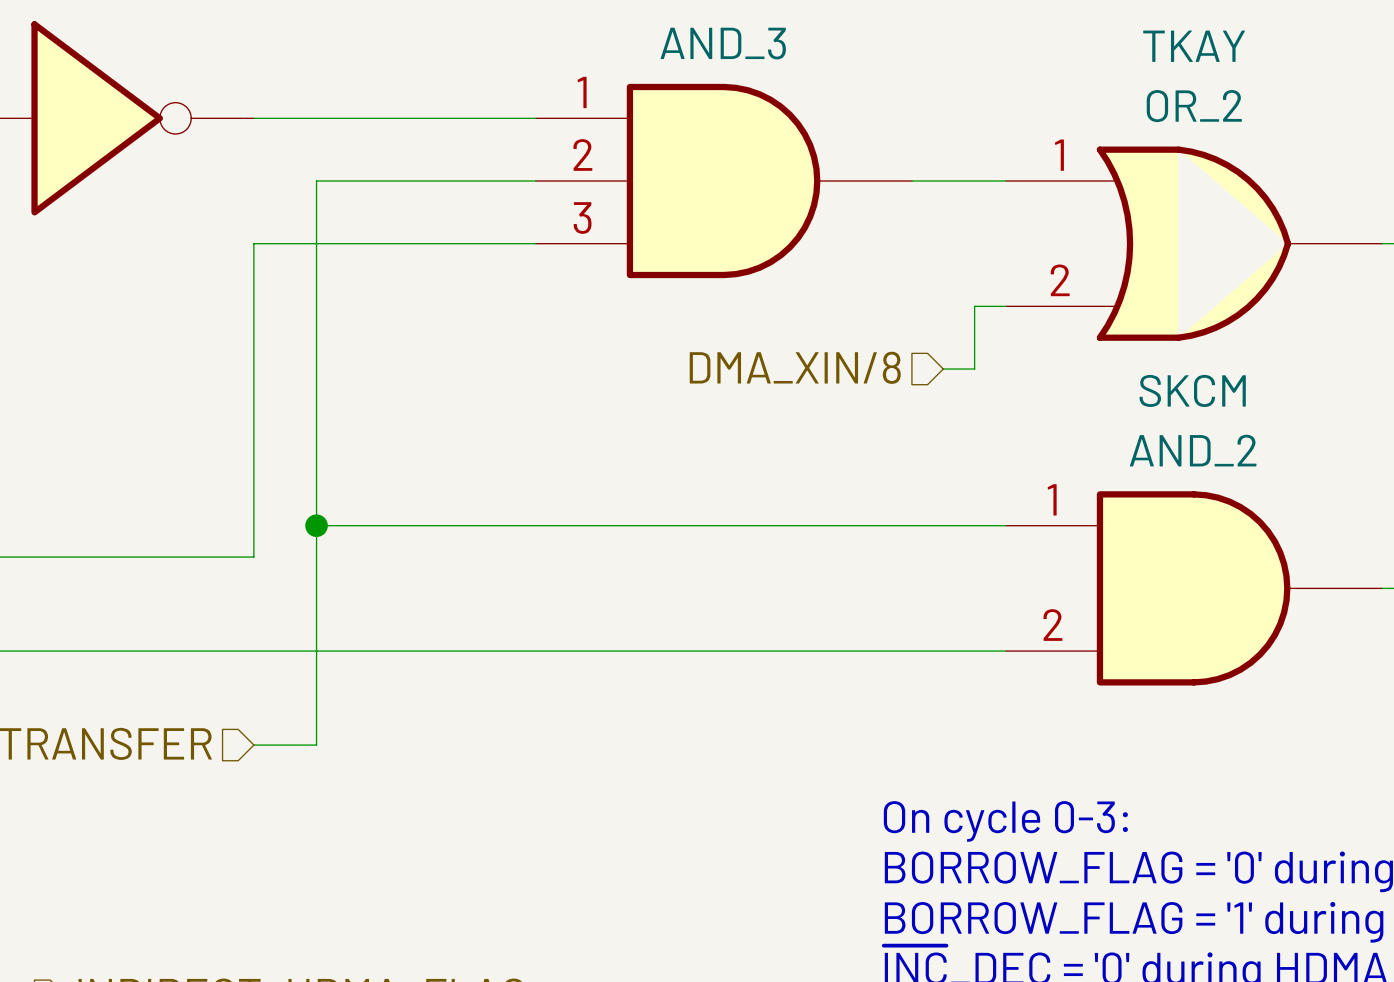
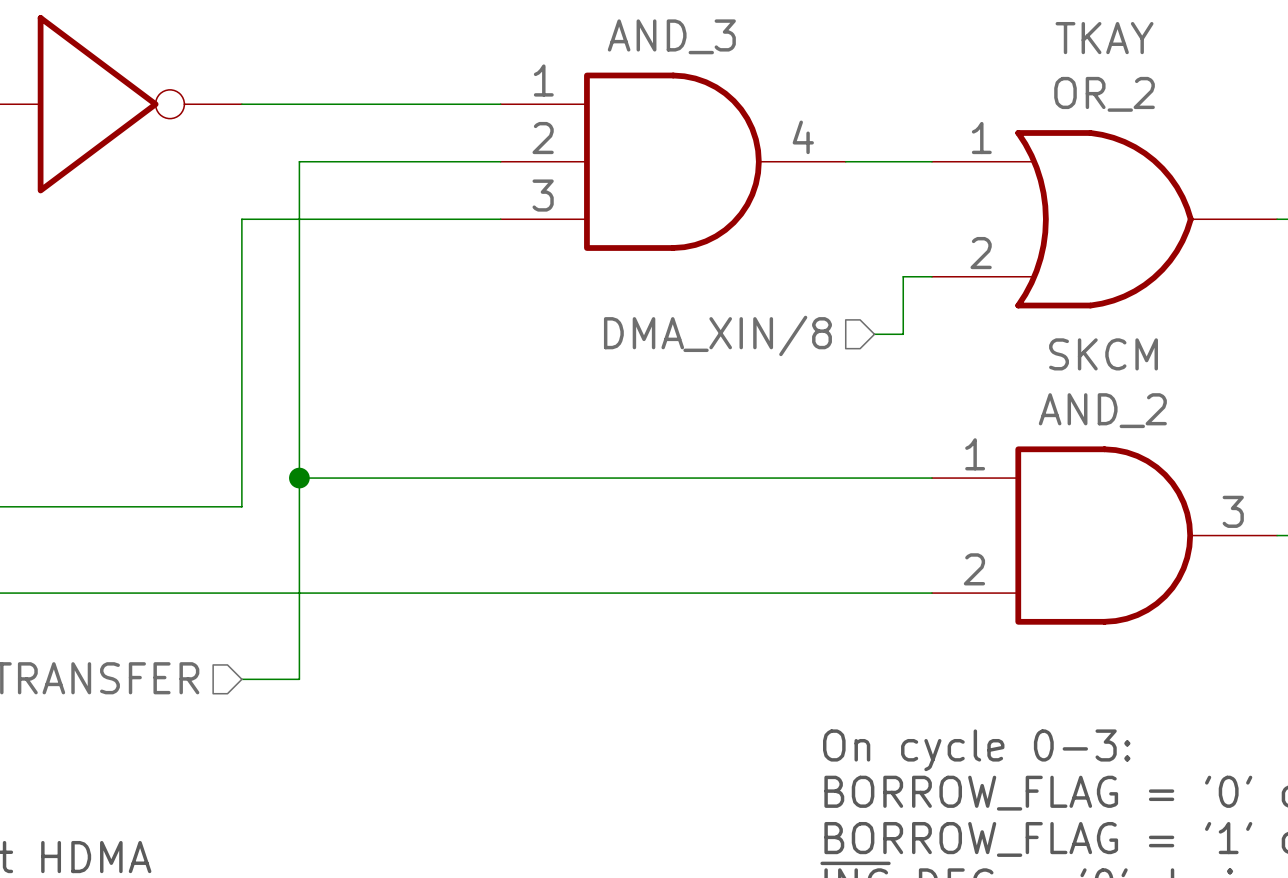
part pin number: none -> 4 (803, 137)
SKCM pin number: none -> 3 (1233, 511)

